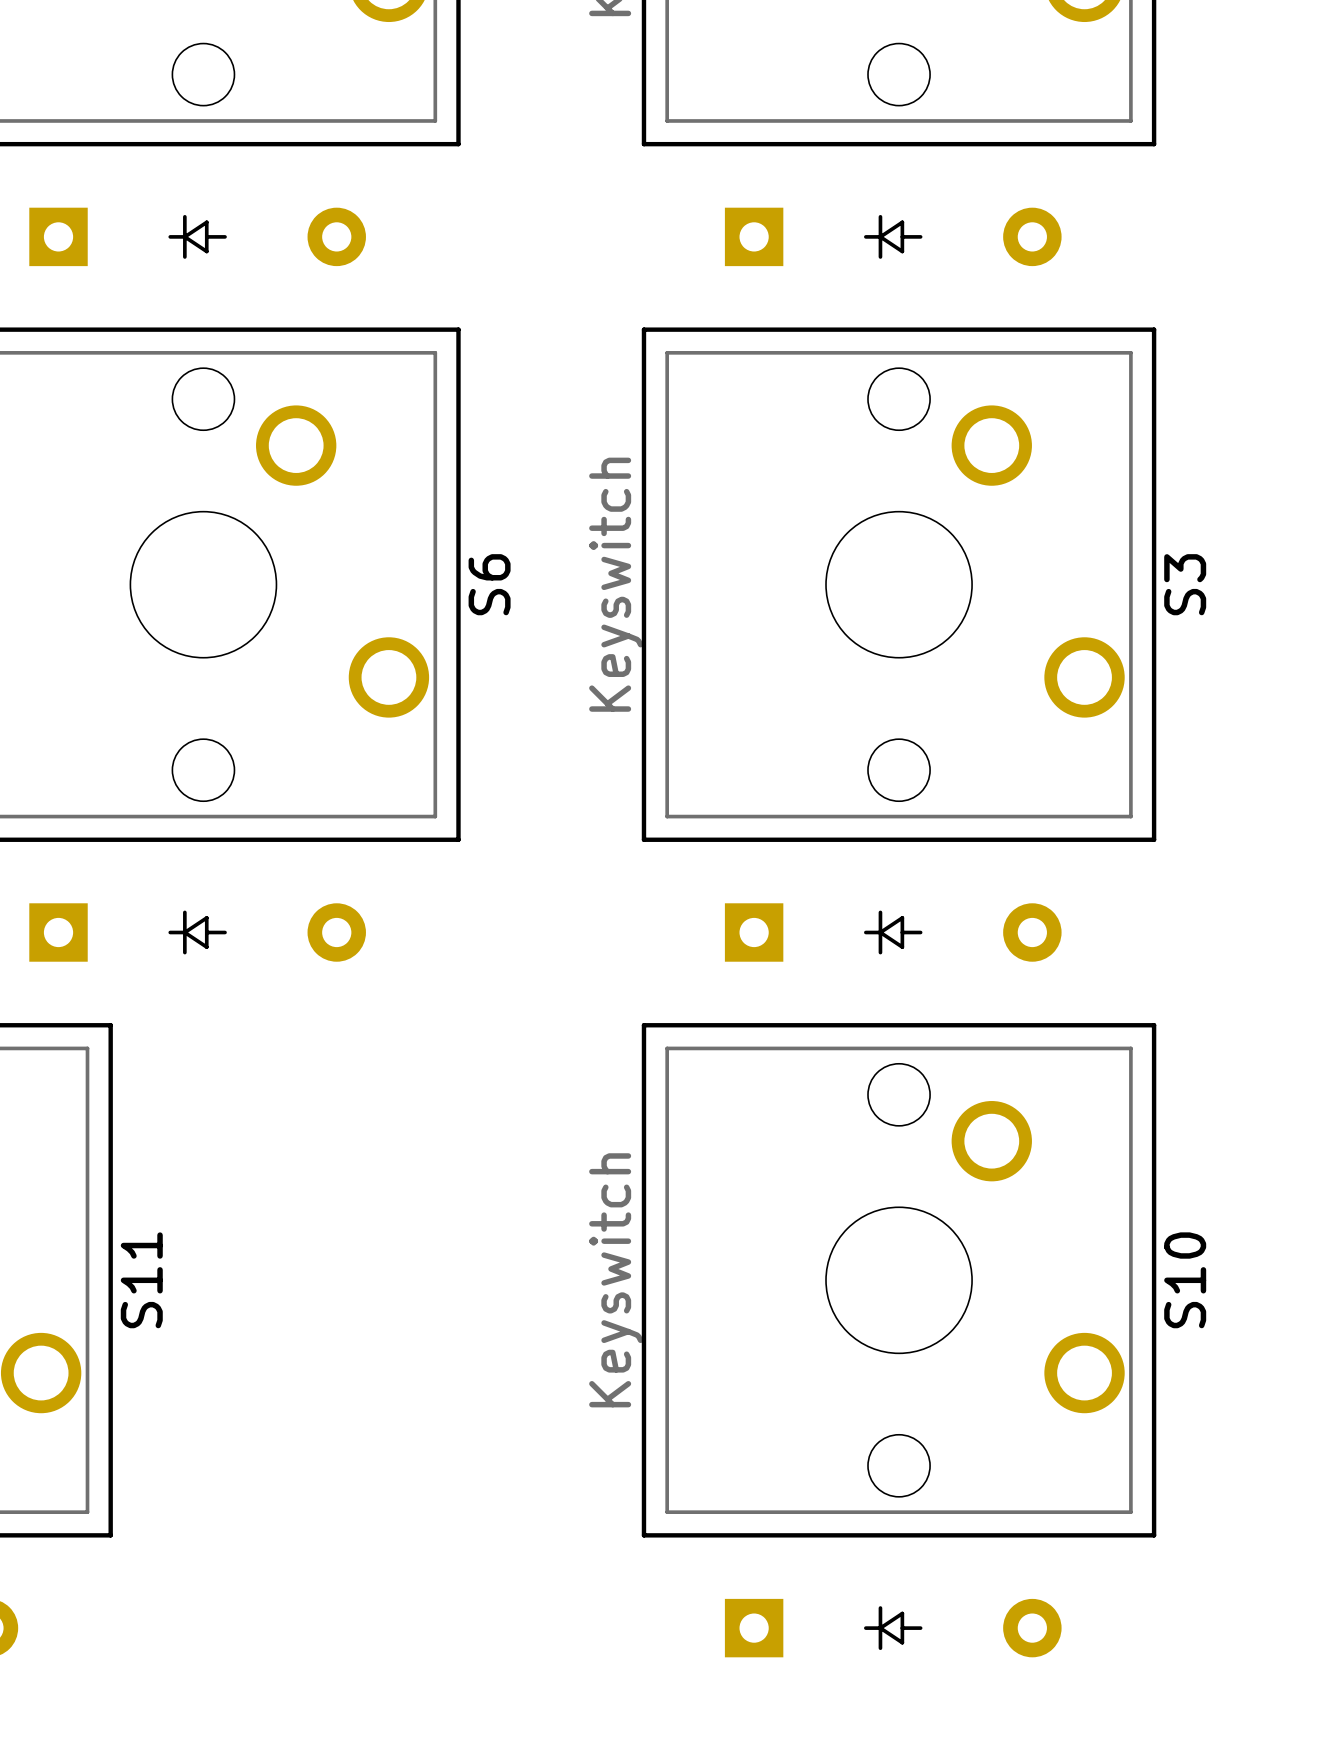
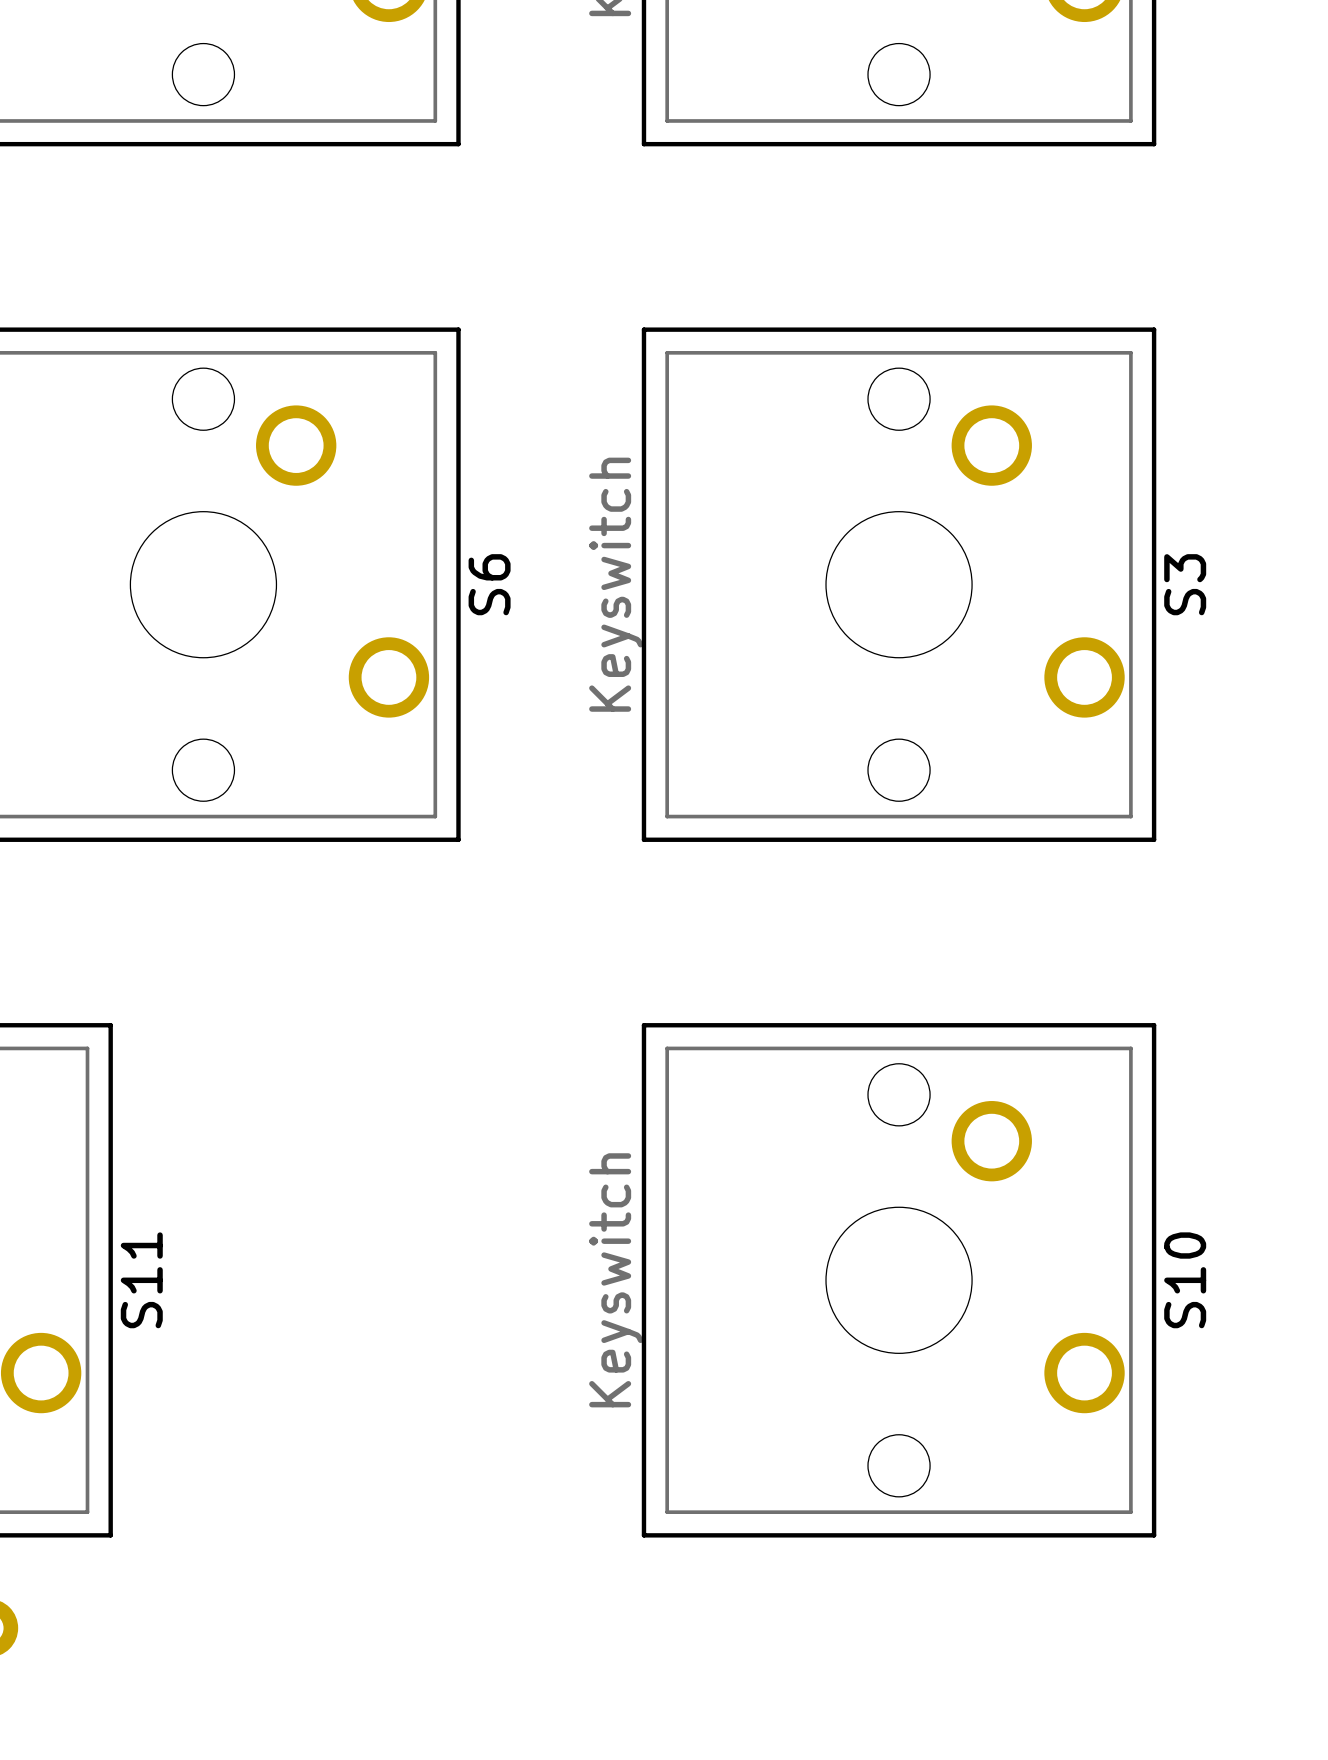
part: (197, 236) -> none
part: (893, 236) -> none
part: (197, 932) -> none
part: (893, 932) -> none
part: (893, 1628) -> none

